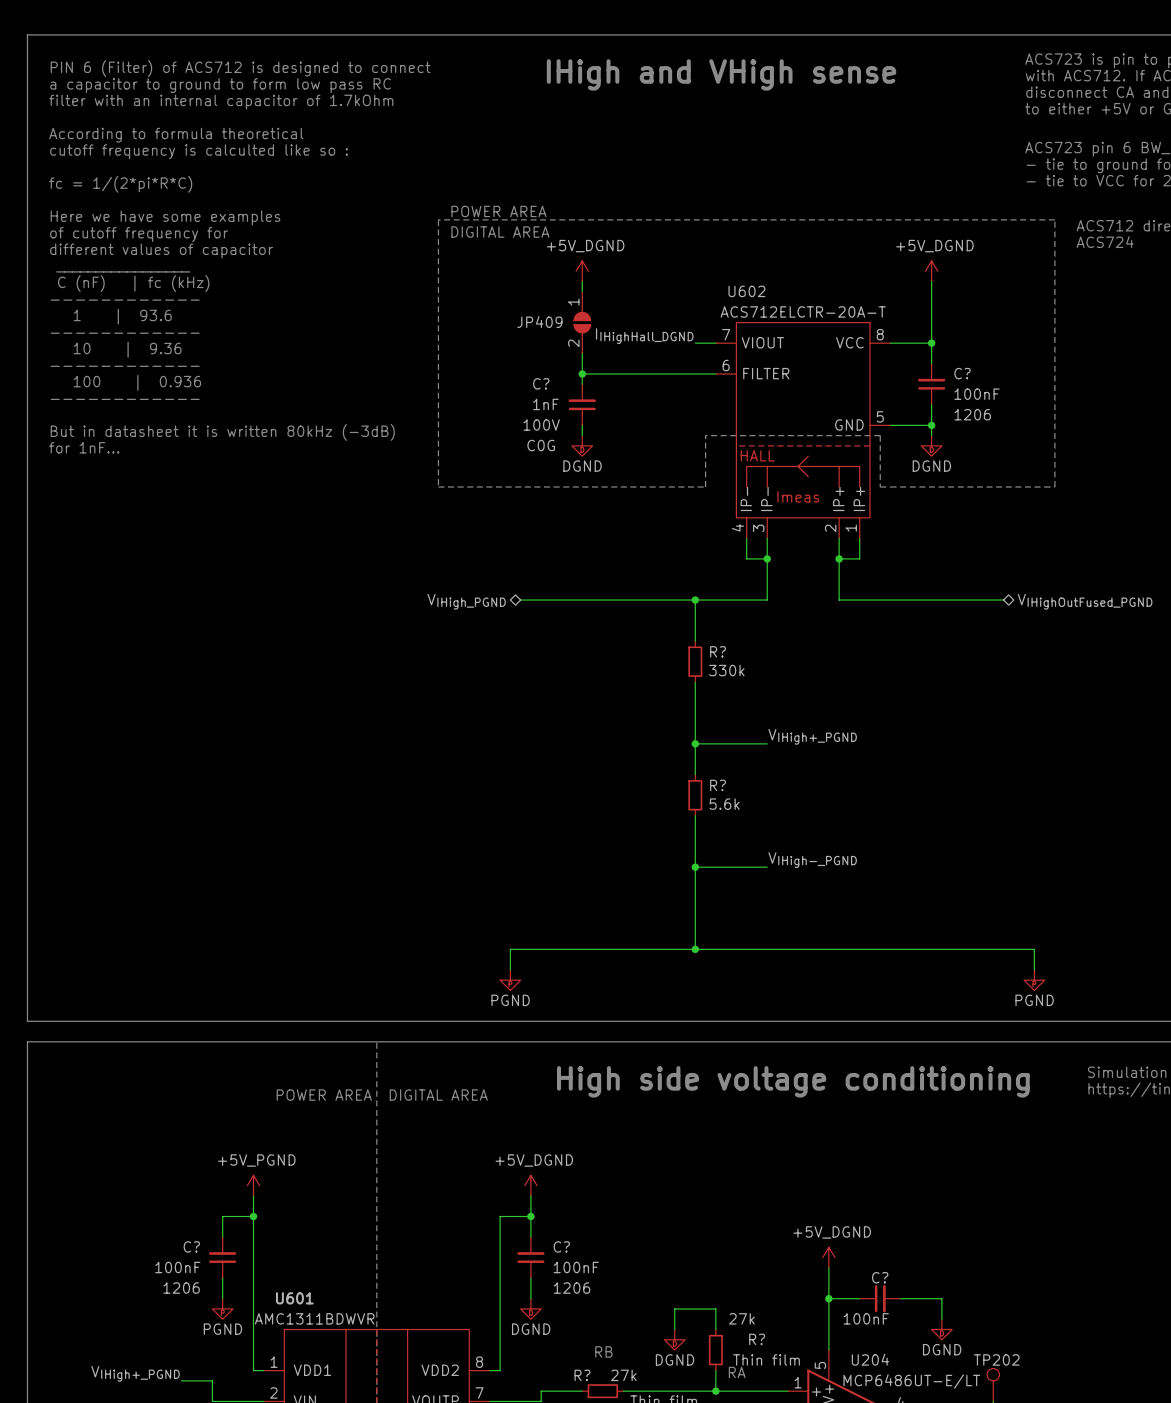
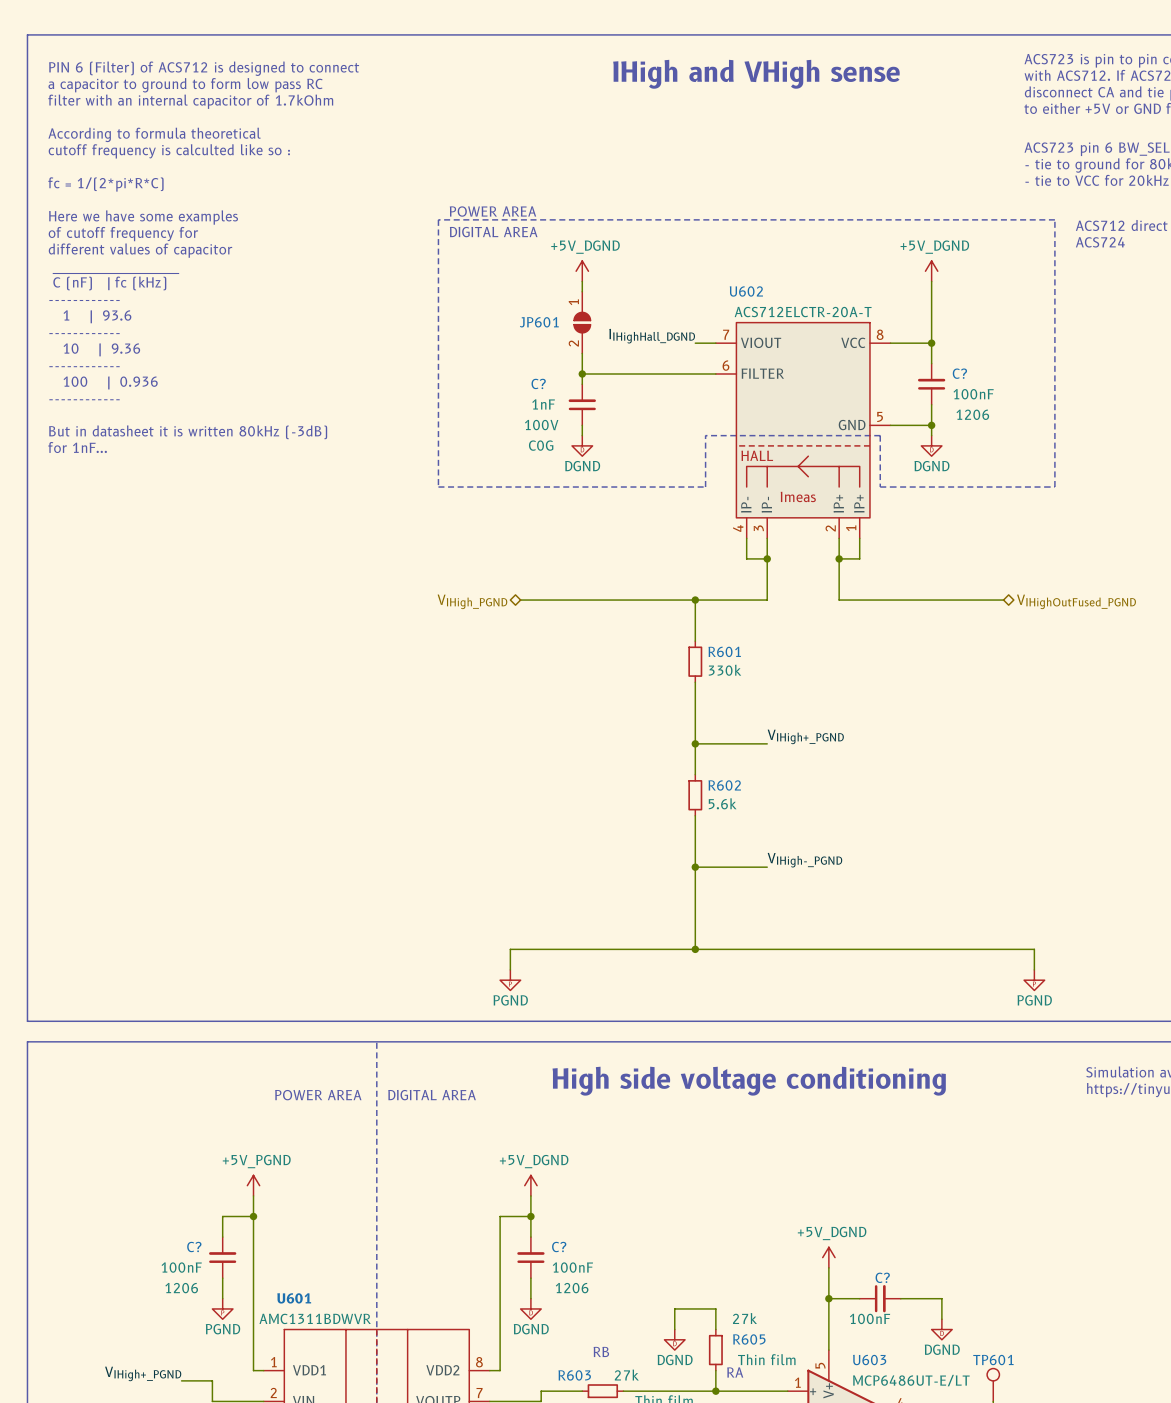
JP409 name: JP409 (539, 321) -> JP601 (539, 322)
R? name: R? (718, 651) -> R601 (724, 651)
R? name: R? (718, 785) -> R602 (724, 785)
R? name: R? (757, 1339) -> R605 (749, 1339)
U204 name: U204 (870, 1359) -> U603 (869, 1360)
TP202 name: TP202 (996, 1359) -> TP601 (993, 1360)
R? name: R? (582, 1375) -> R603 (574, 1375)

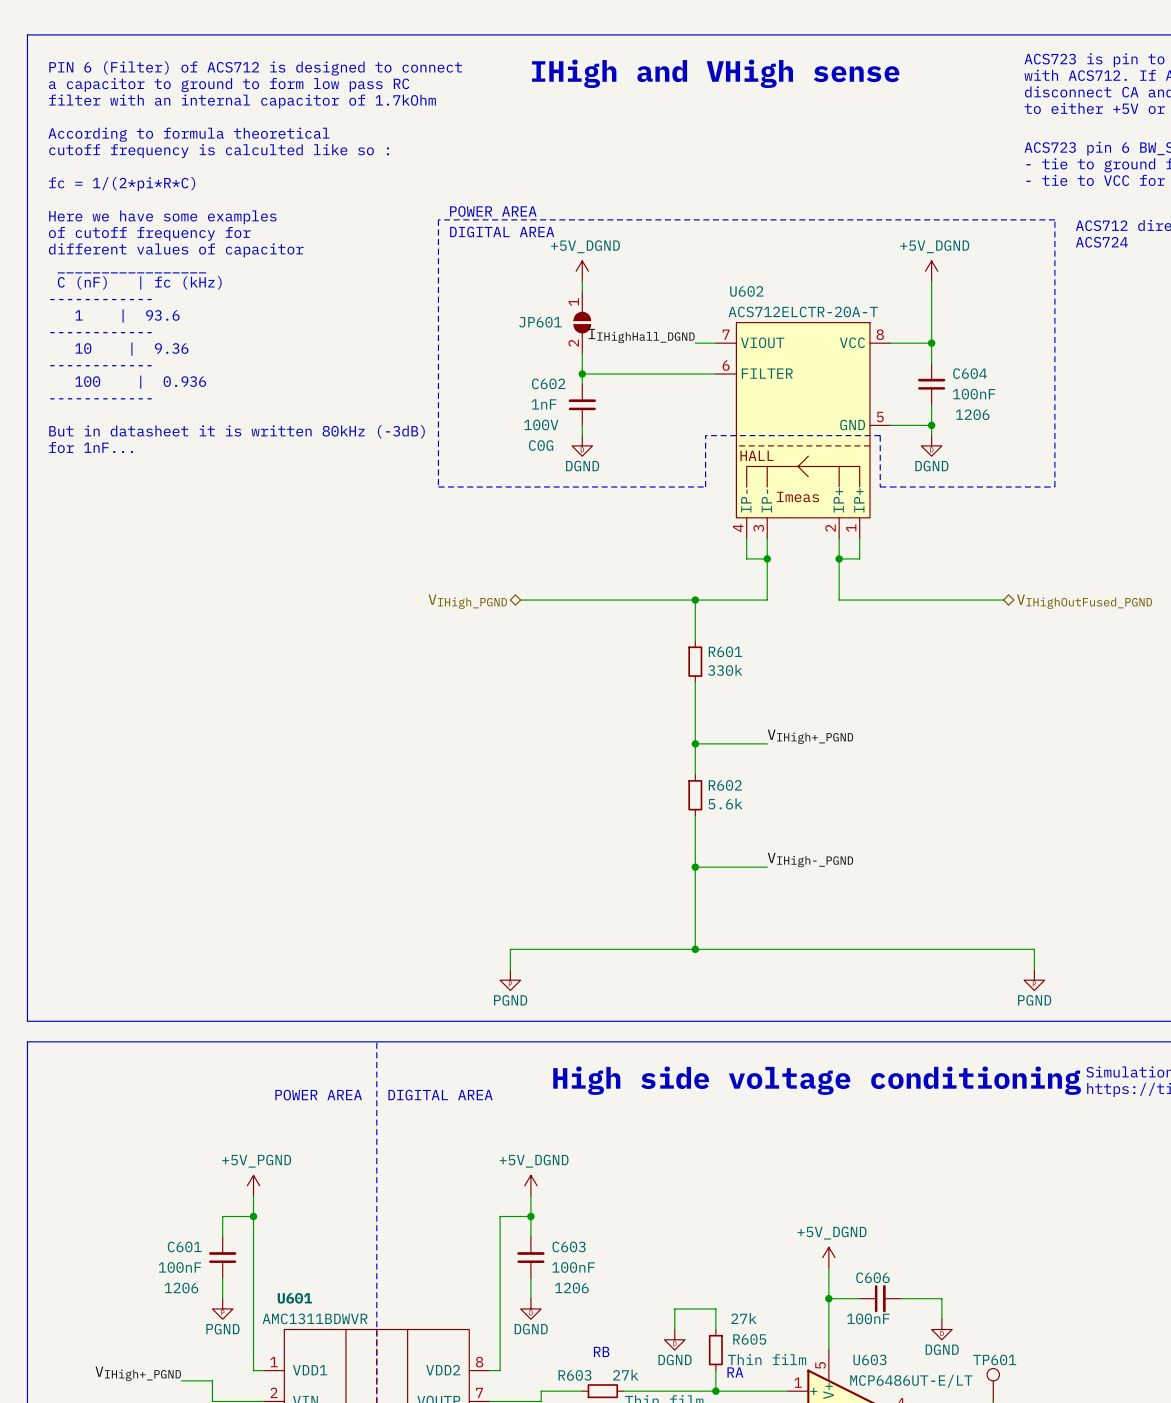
C? name: C? (959, 373) -> C604 (970, 373)
C? name: C? (538, 383) -> C602 (548, 383)
C? name: C? (194, 1247) -> C601 (184, 1246)
C? name: C? (559, 1247) -> C603 (569, 1246)
C? name: C? (882, 1277) -> C606 (872, 1277)

